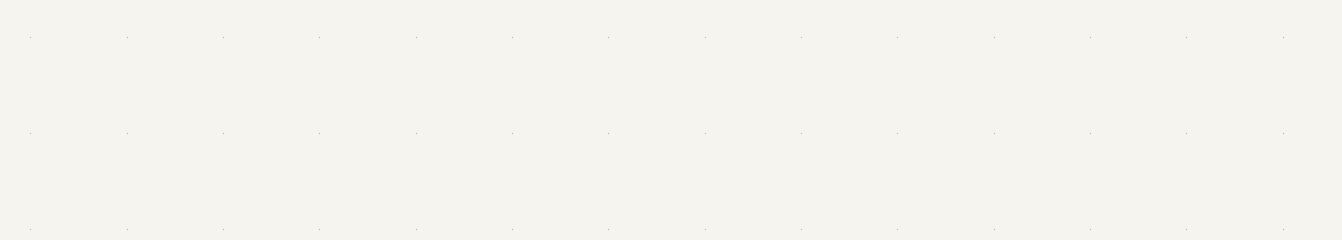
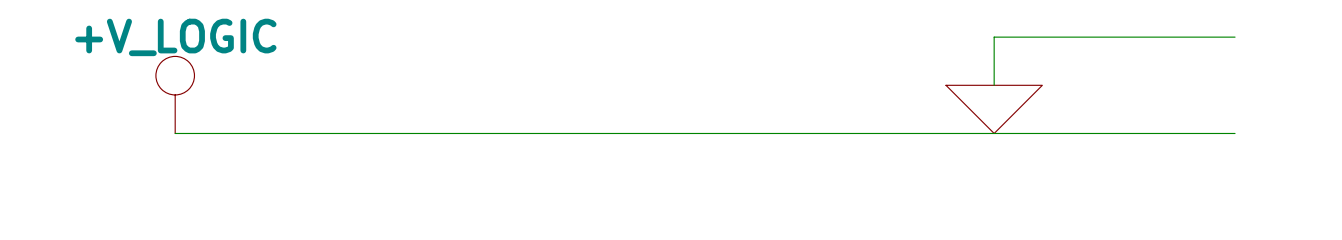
wire: none -> (1235, 37) (994, 37) (994, 85)
power symbol: none -> +V_LOGIC (175, 94)
power symbol: none -> (994, 109)
wire: none -> (175, 133) (1235, 133)

